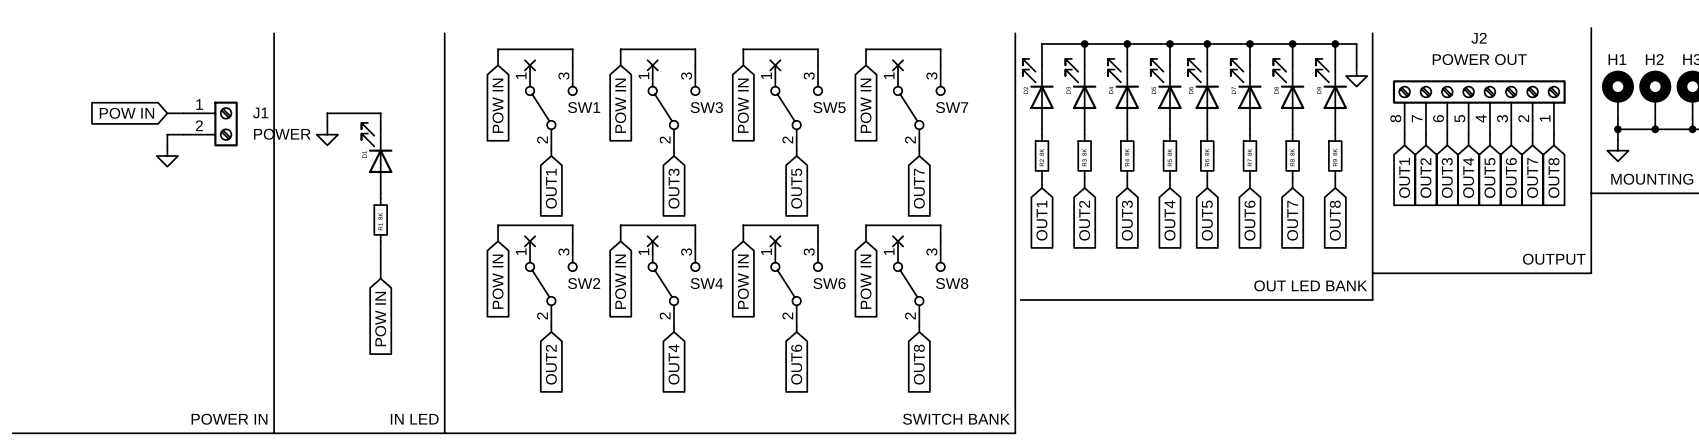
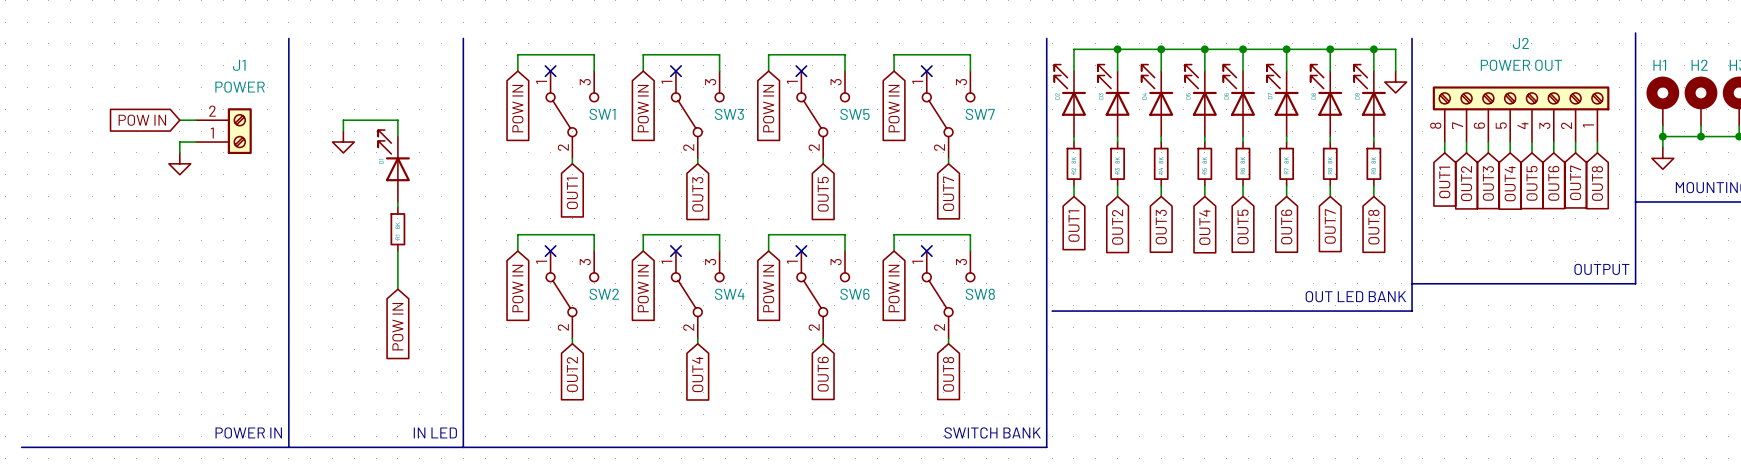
J1 name position: J1 (260, 113) -> J1 (239, 65)
J1 flip: as is (226, 123) -> up-down (239, 131)
J1 value position: POWER (282, 134) -> POWER (240, 87)

